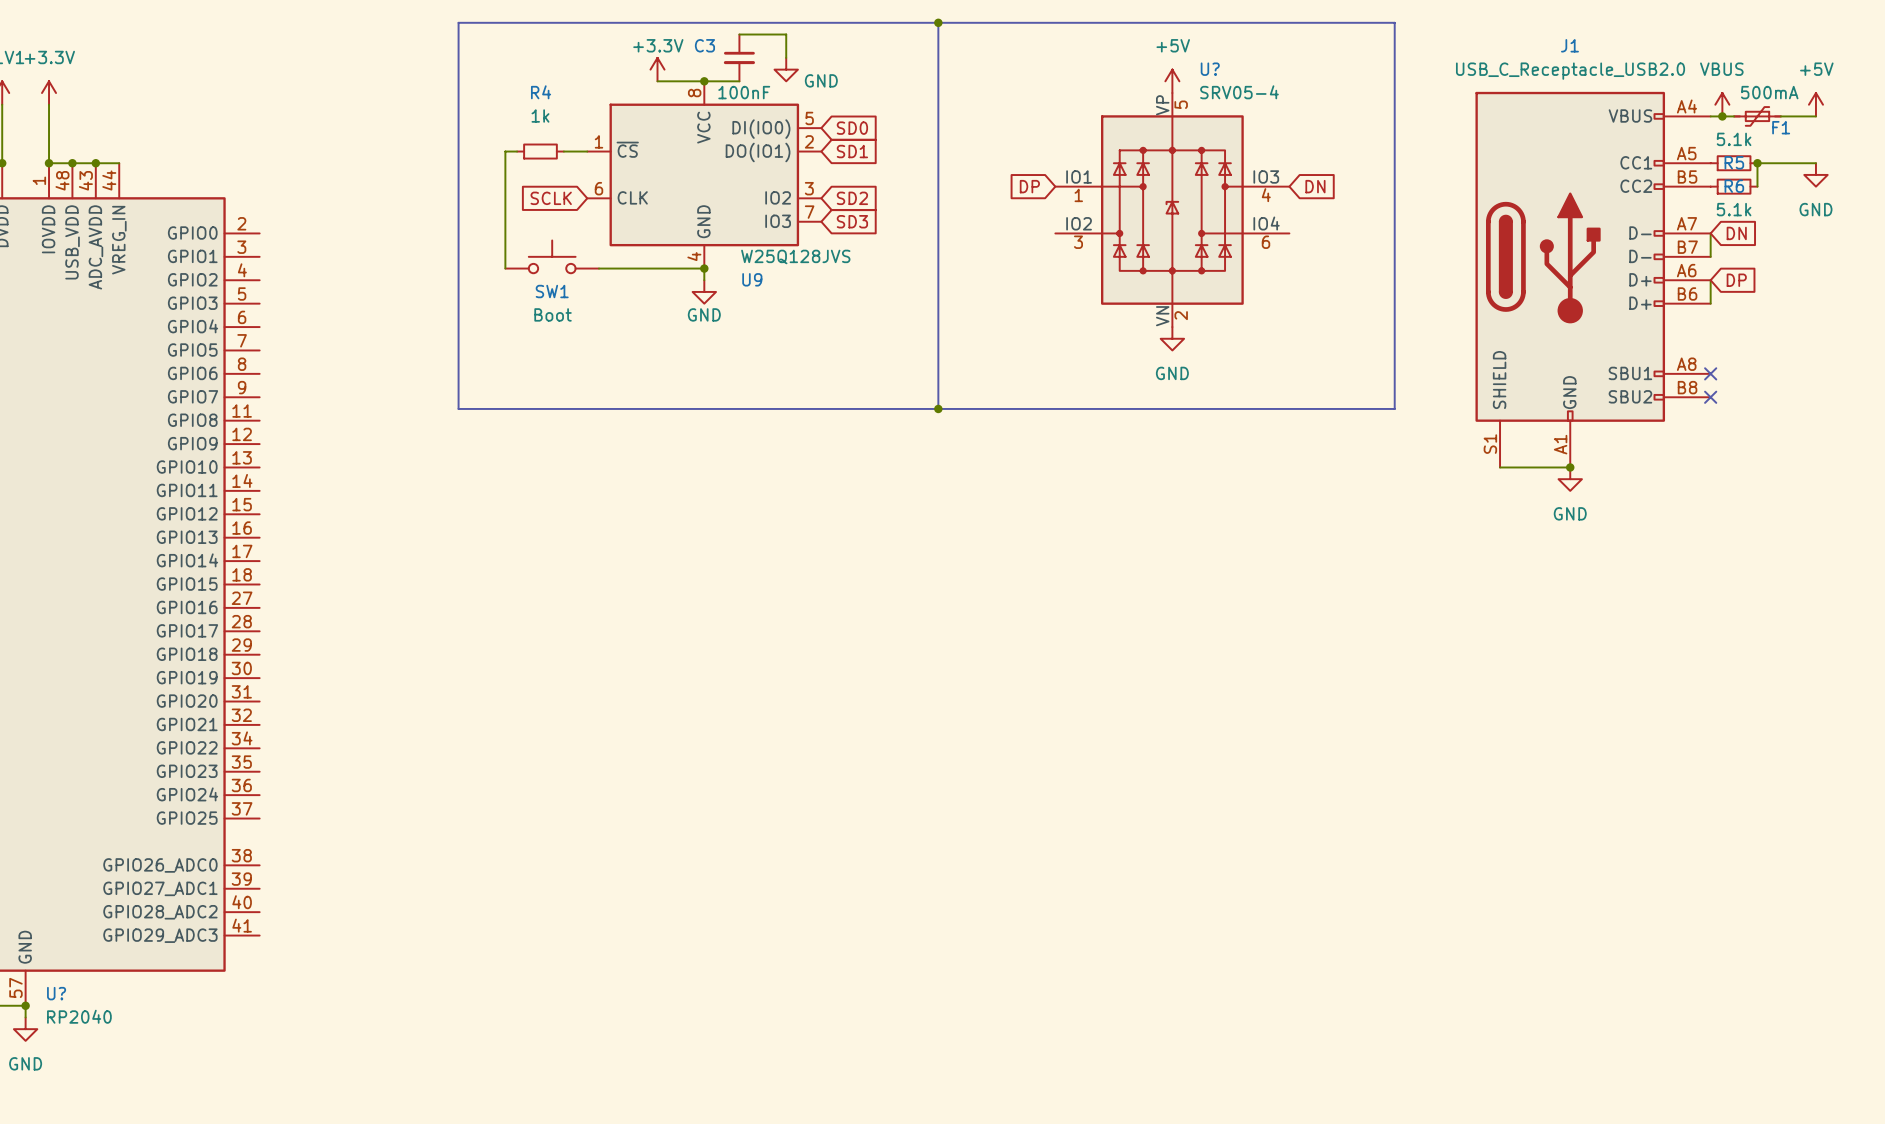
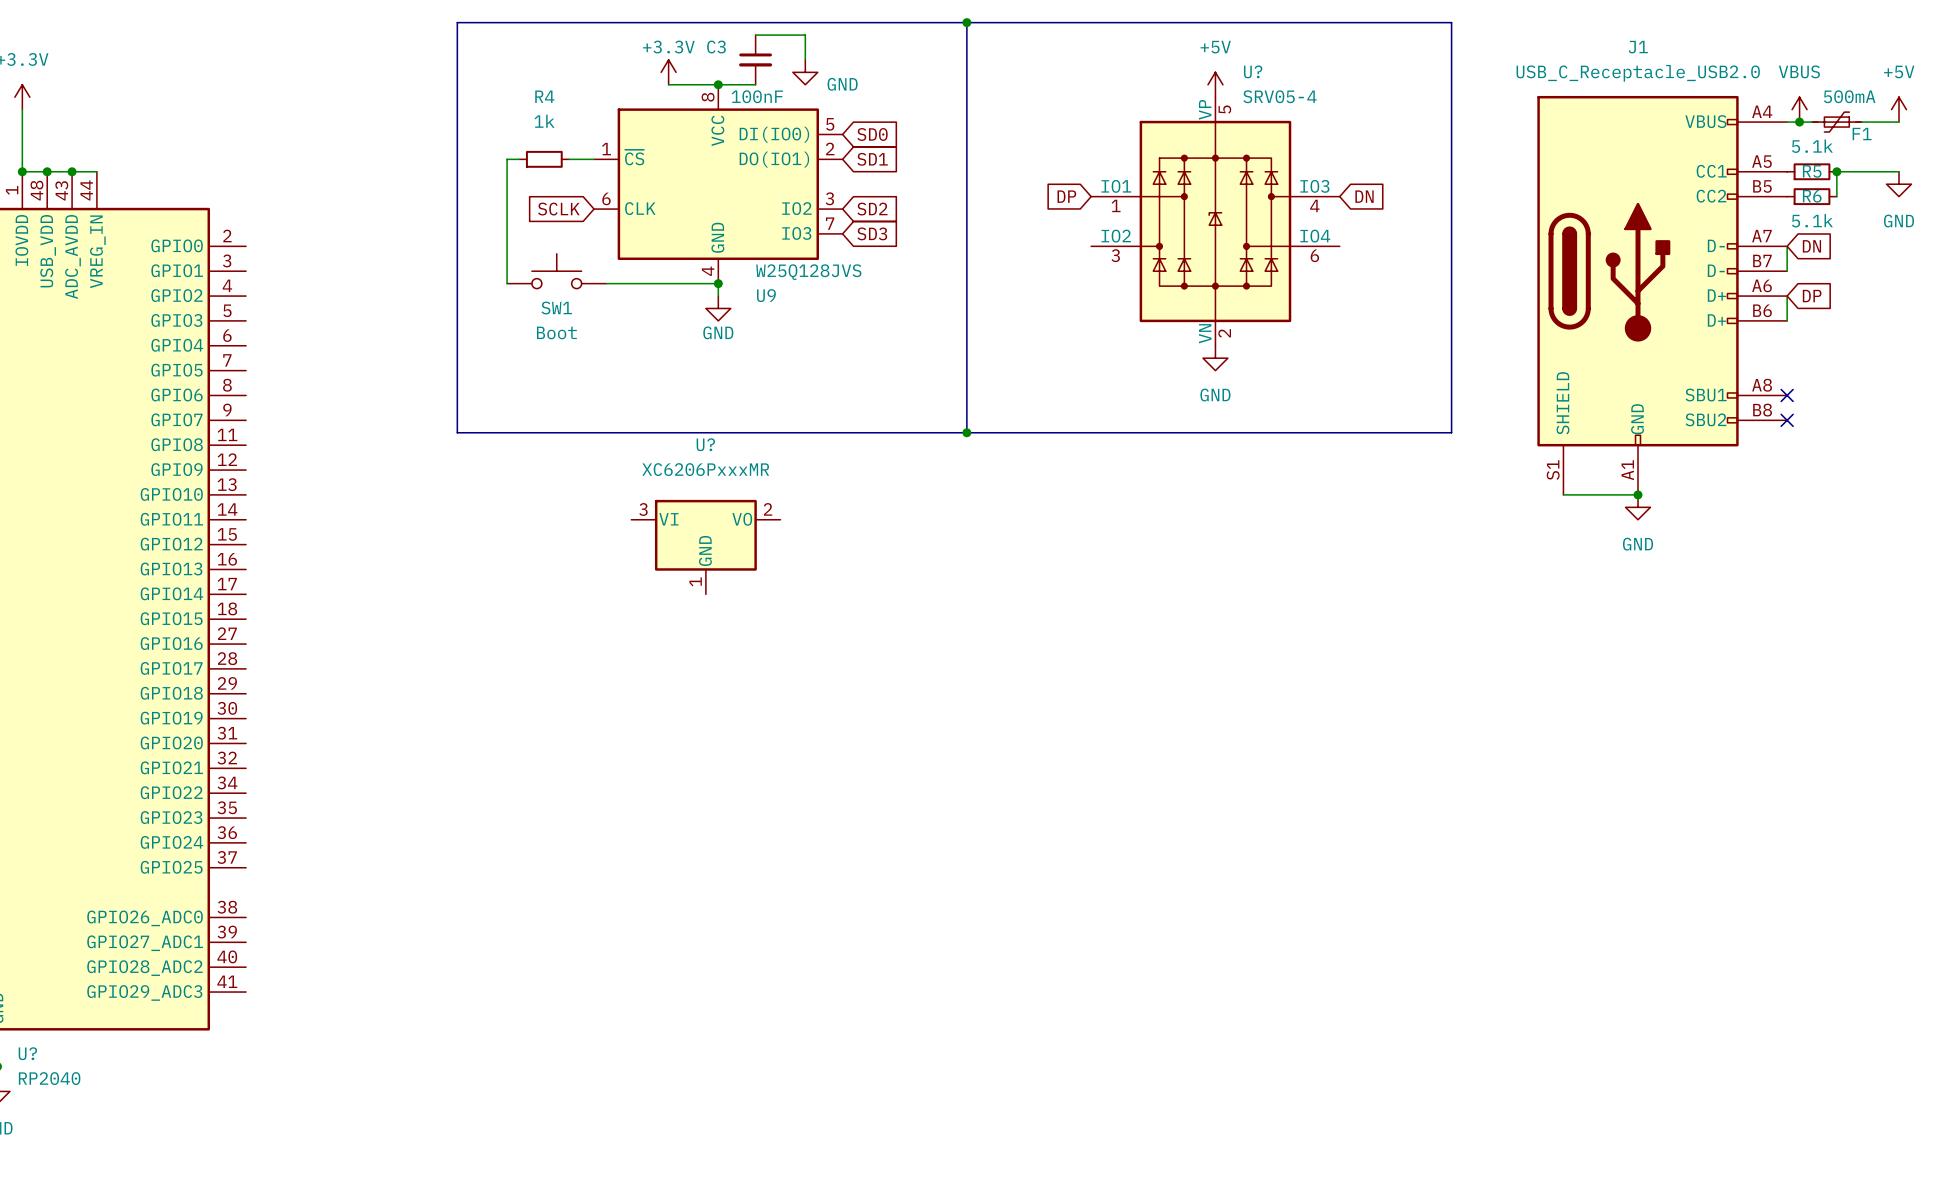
U?: none -> XC6206PxxxMR (705, 547)

